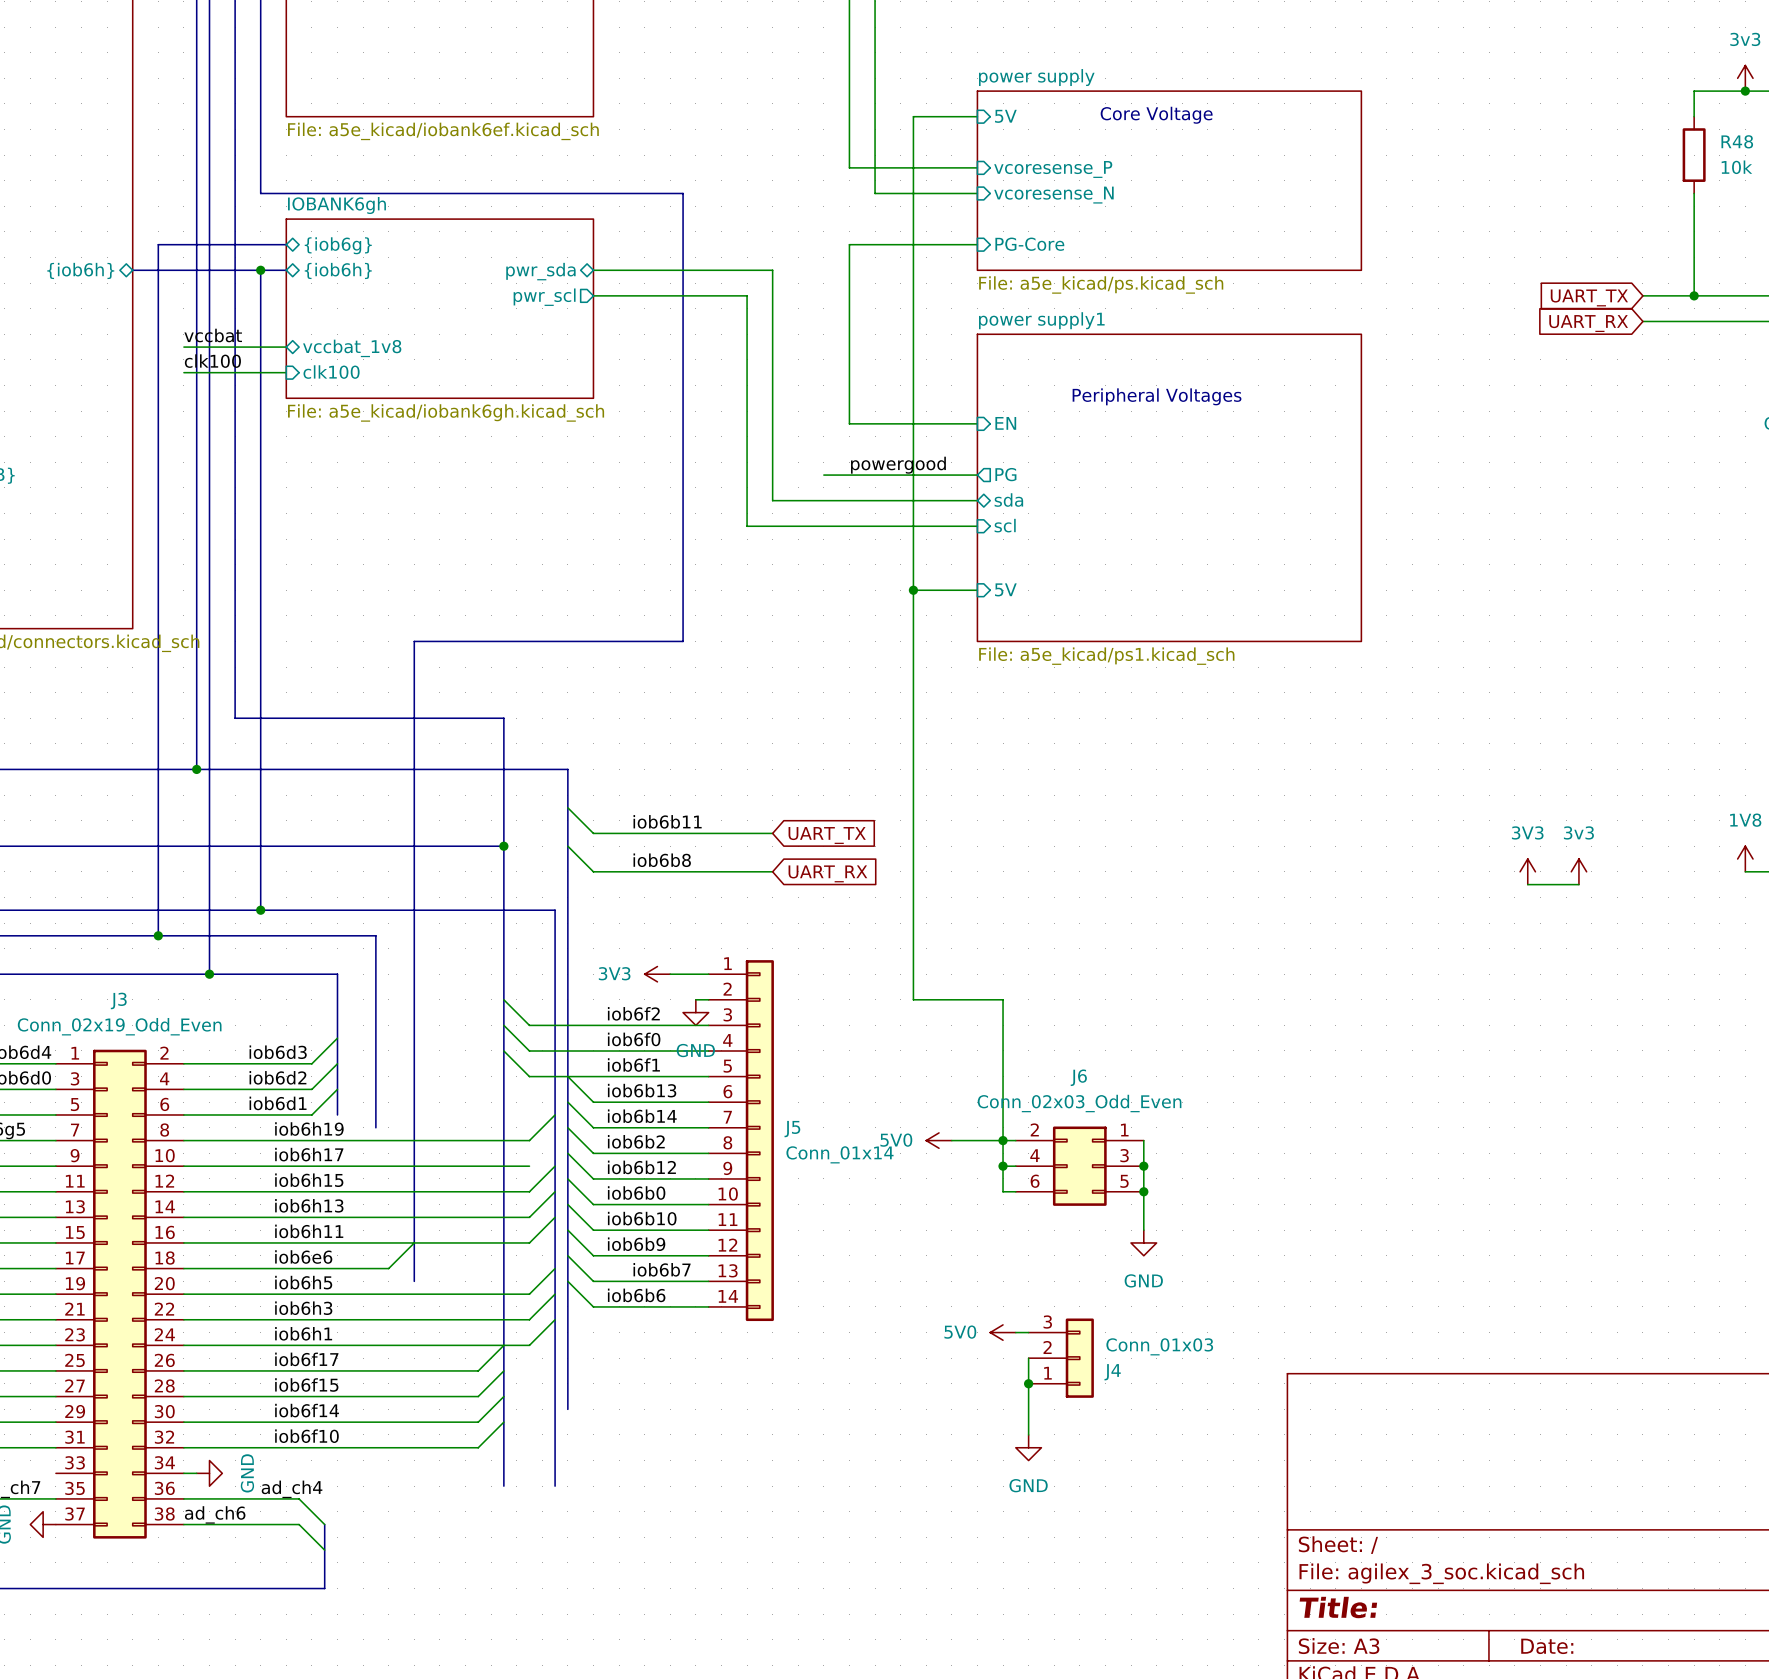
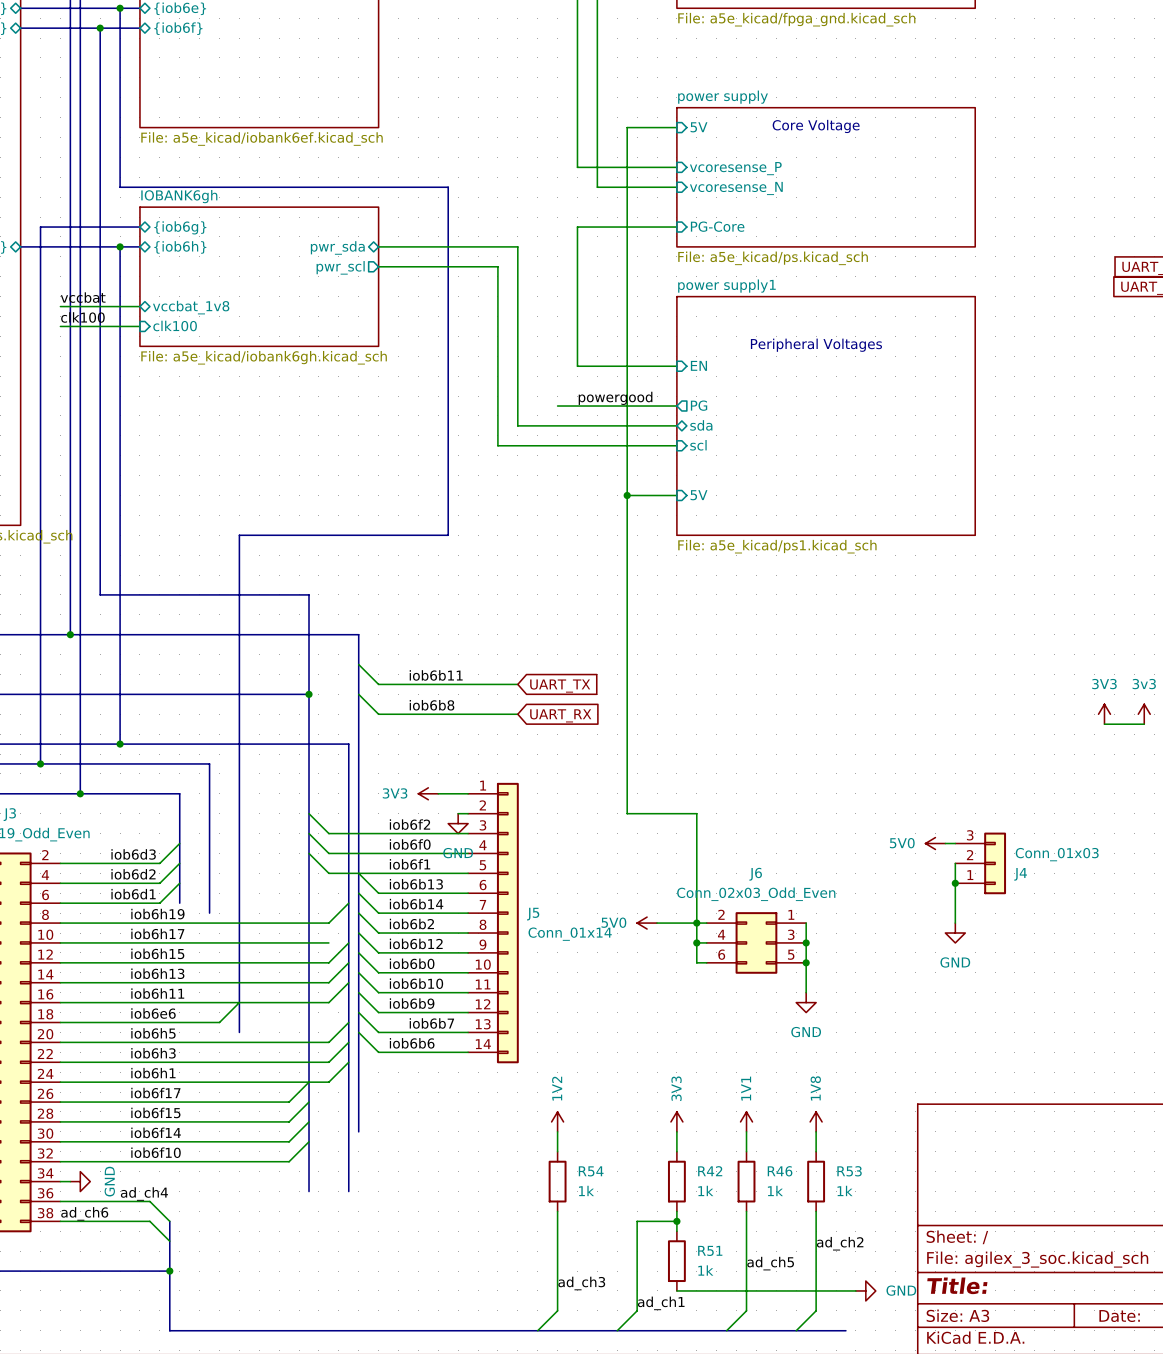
power symbol: none -> 5V0 (935, 843)
wire: none -> (945, 843) (955, 843)
wire: none -> (955, 863) (955, 923)
junction: none -> (955, 883)
power symbol: none -> GND (955, 933)
power symbol: 5V0 (1003, 1332) -> none
wire: (1015, 1332) (1028, 1332) -> none
wire: (1028, 1358) (1028, 1434) -> none
J4 position: (1061, 1358) -> (980, 863)
junction: (1028, 1383) -> none
power symbol: none -> 1V2 (557, 1121)
power symbol: none -> 3V3 (676, 1121)
power symbol: none -> 1V1 (746, 1121)
power symbol: none -> 1V8 (816, 1121)
wire: none -> (557, 1131) (557, 1151)
wire: none -> (676, 1131) (676, 1151)
wire: none -> (746, 1131) (746, 1151)
wire: none -> (816, 1131) (816, 1151)
power symbol: GND (1028, 1447) -> none
R54: none -> 1k (557, 1181)
R42: none -> 1k (676, 1181)
R46: none -> 1k (746, 1181)
R53: none -> 1k (816, 1181)
wire: none -> (557, 1211) (557, 1310) (537, 1330)
wire: none -> (676, 1211) (676, 1231)
wire: none -> (746, 1211) (746, 1310) (726, 1330)
wire: none -> (816, 1211) (816, 1310) (796, 1330)
wire: none -> (676, 1221) (637, 1221) (637, 1310) (617, 1330)
junction: none -> (676, 1221)
label: none -> ad_ch2 (840, 1243)
R51: none -> 1k (676, 1261)
label: none -> ad_ch5 (770, 1263)
bus: none -> (169, 1271) (169, 1330) (845, 1330)
junction: none -> (169, 1271)
label: none -> ad_ch3 (581, 1283)
wire: none -> (676, 1290) (855, 1290)
power symbol: none -> GND (865, 1290)
label: none -> ad_ch1 (661, 1303)

